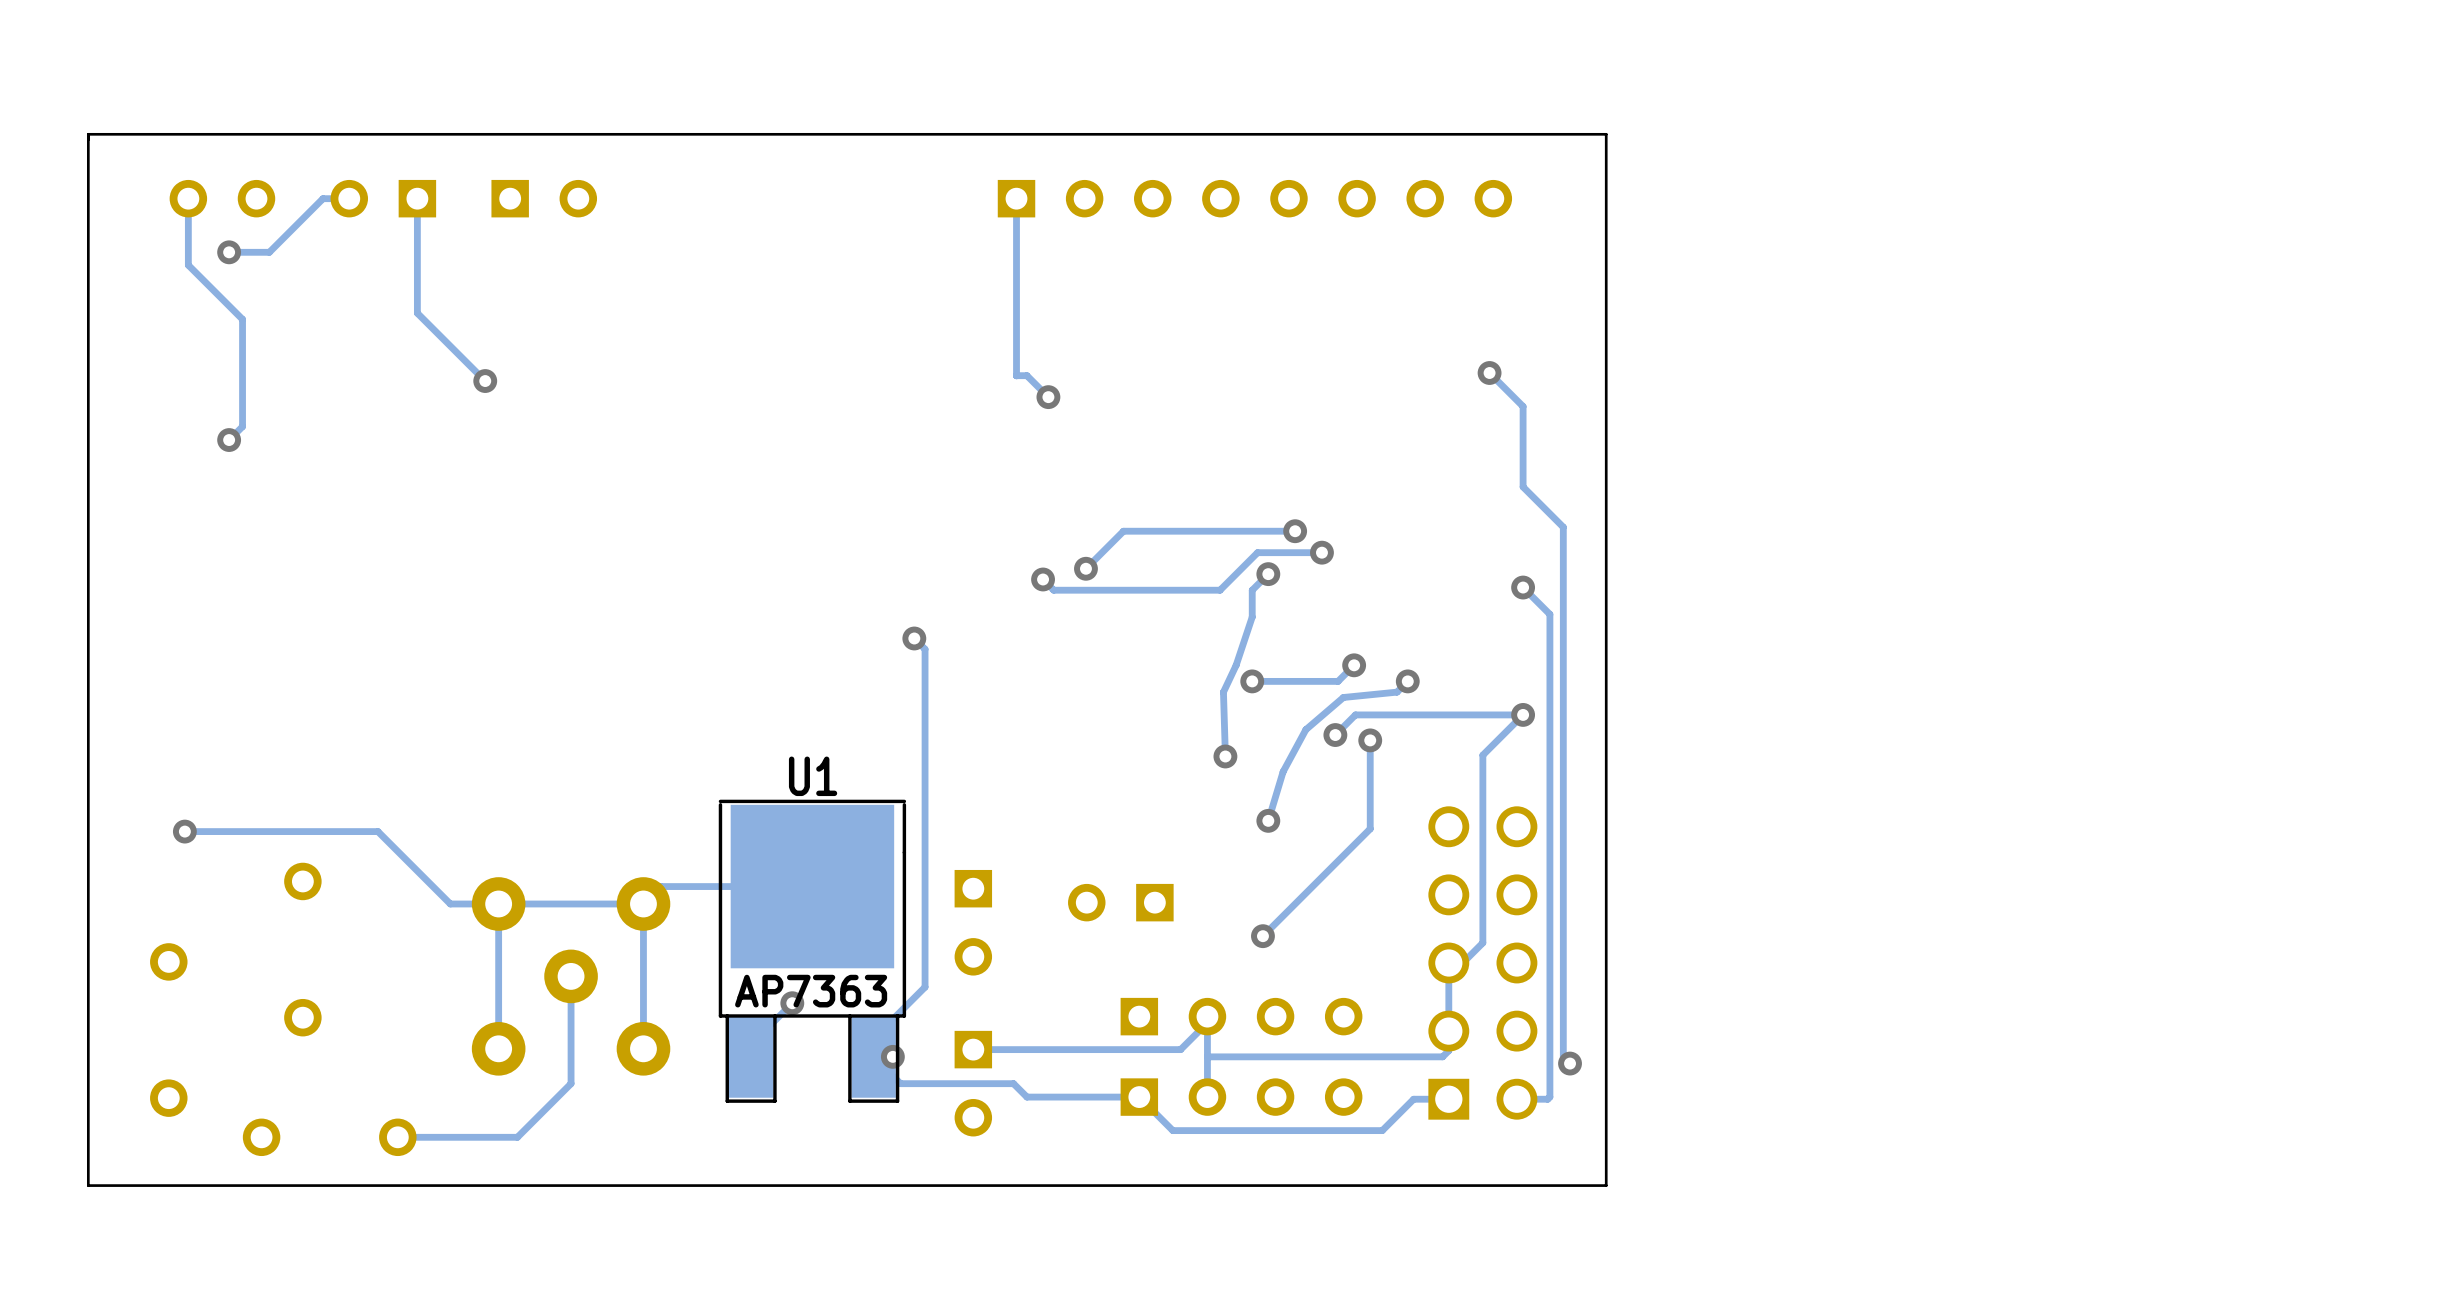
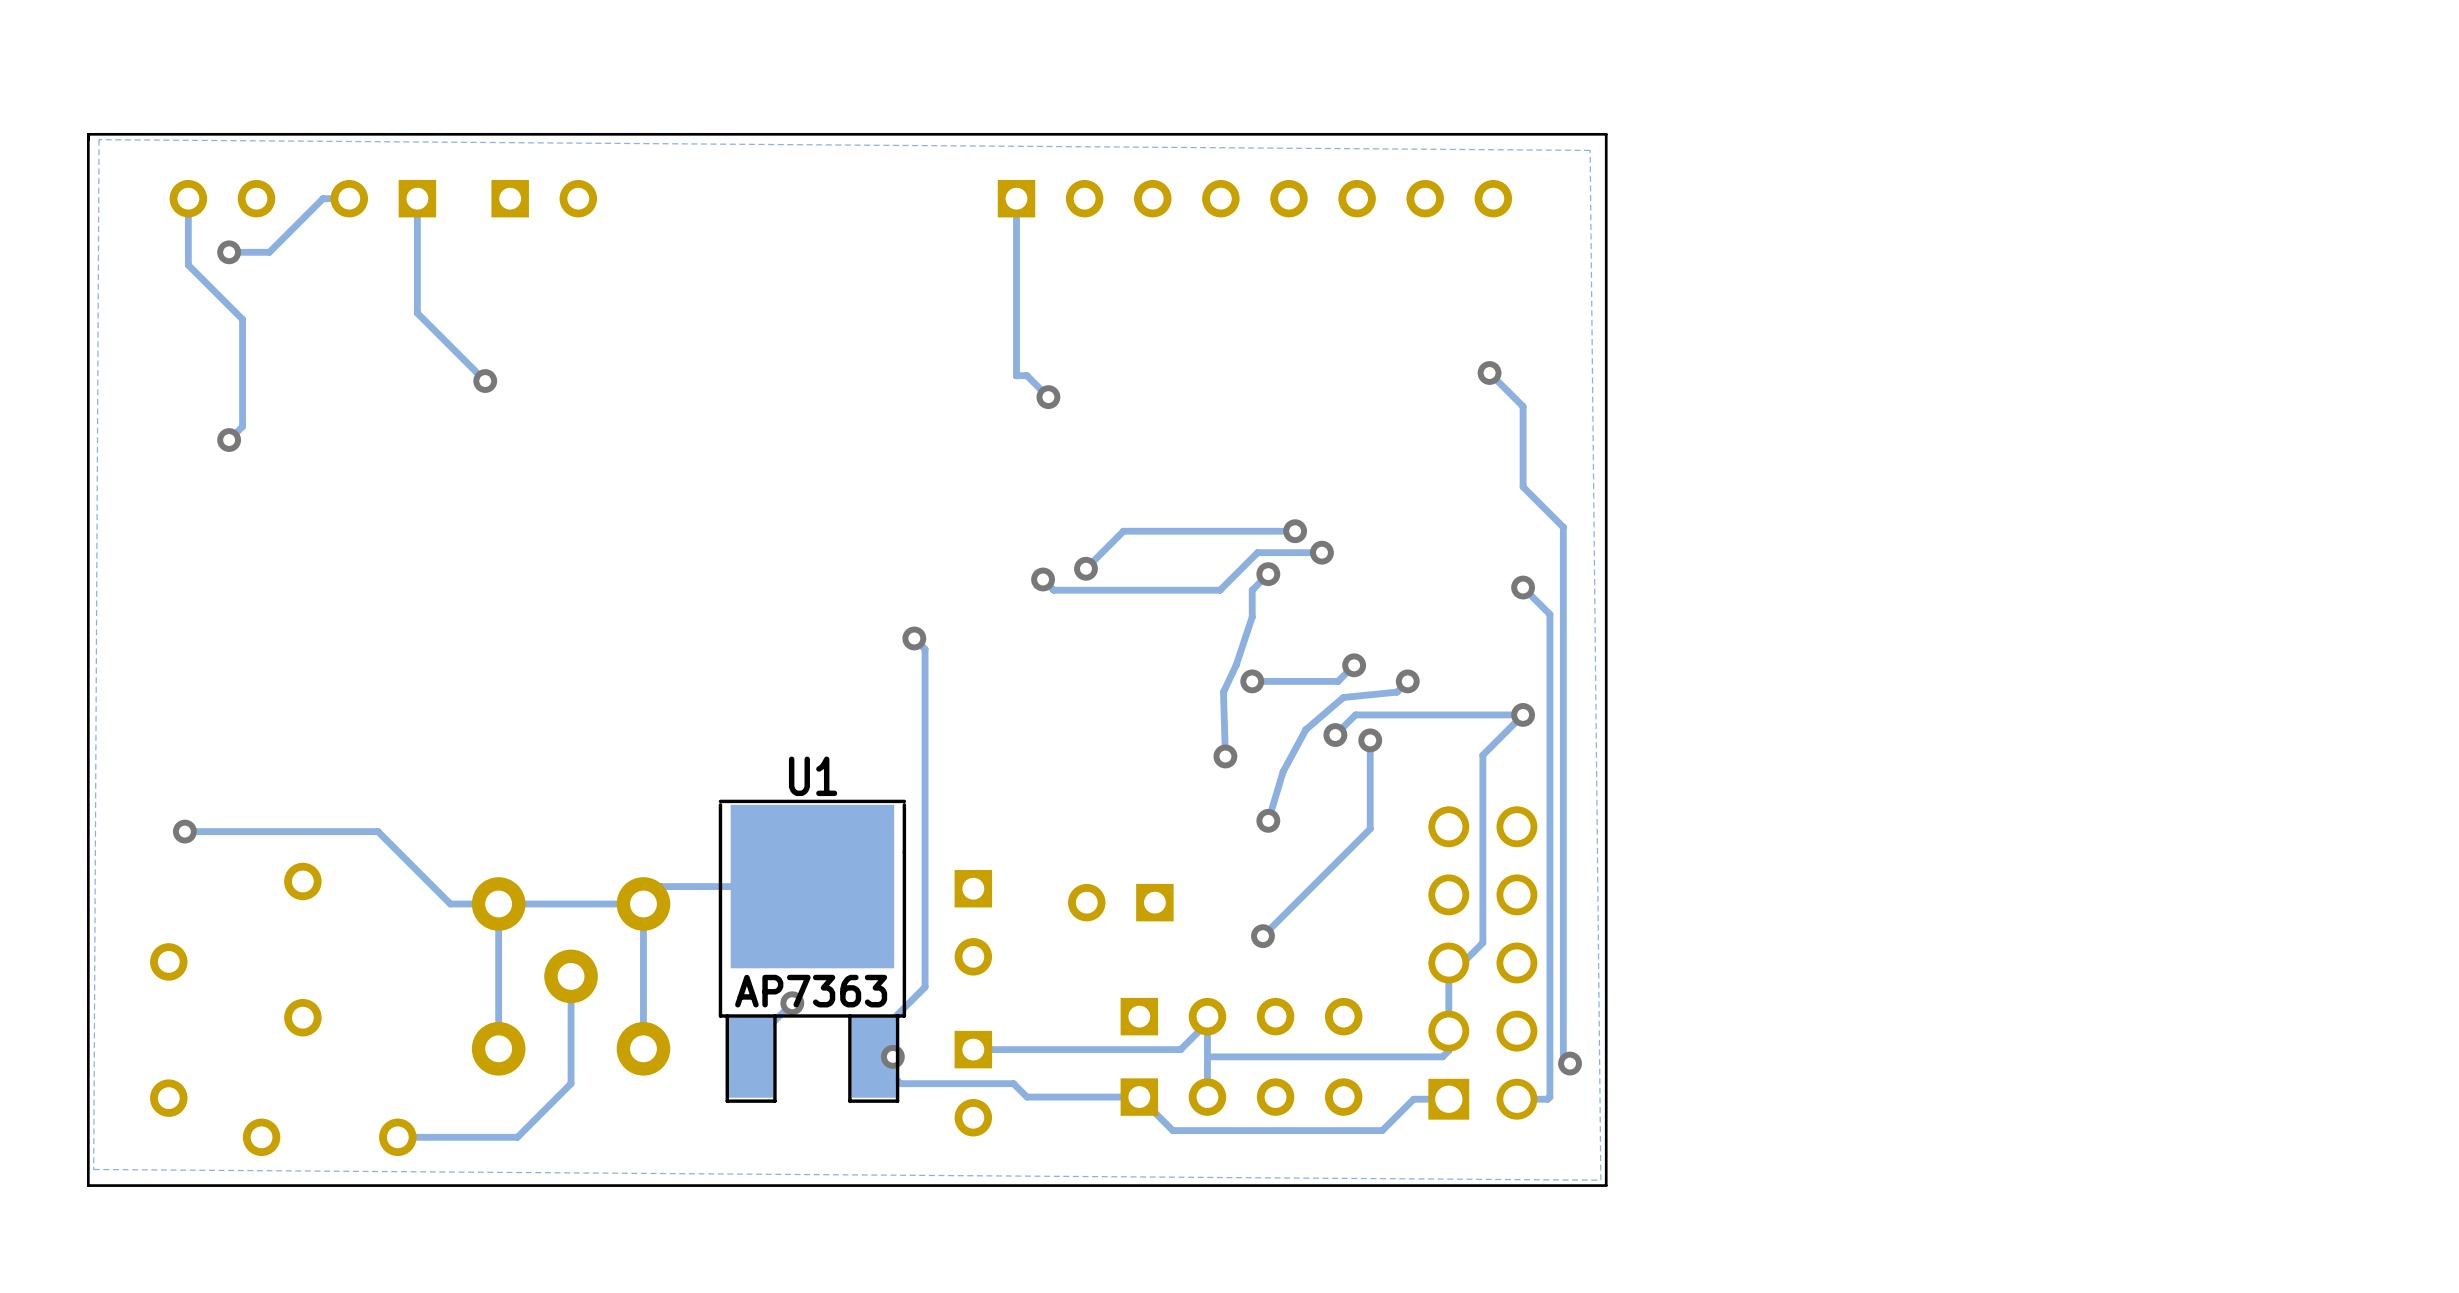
zone outline: none -> (99, 139) (1590, 150) (1600, 1180) (93, 1169) (99, 139)

